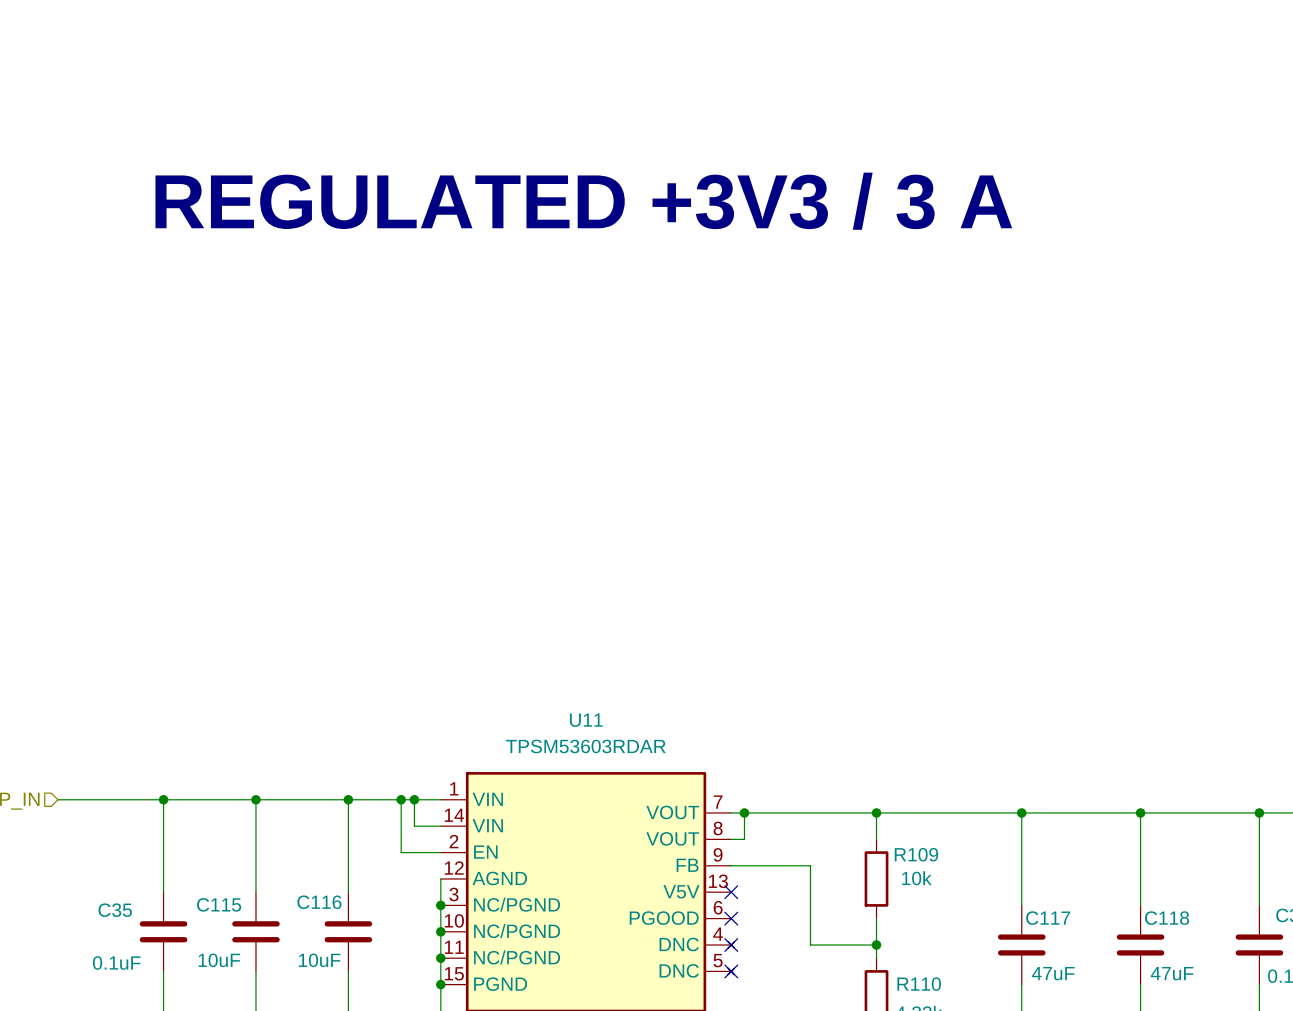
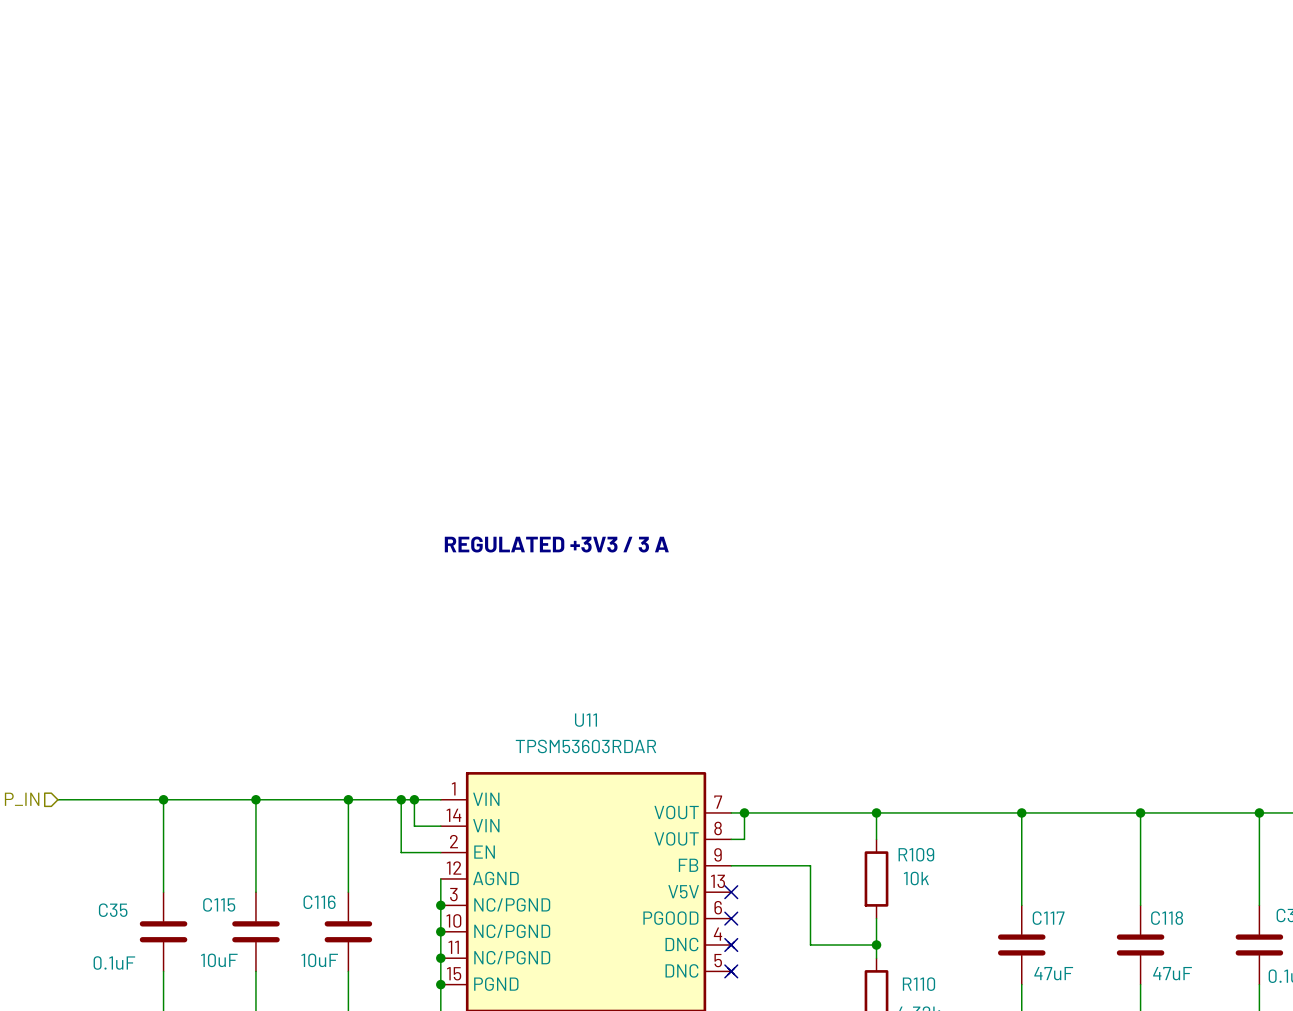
text: REGULATED +3V3 / 3 A (583, 201) -> none
text: none -> REGULATED +3V3 / 3 A (556, 544)

